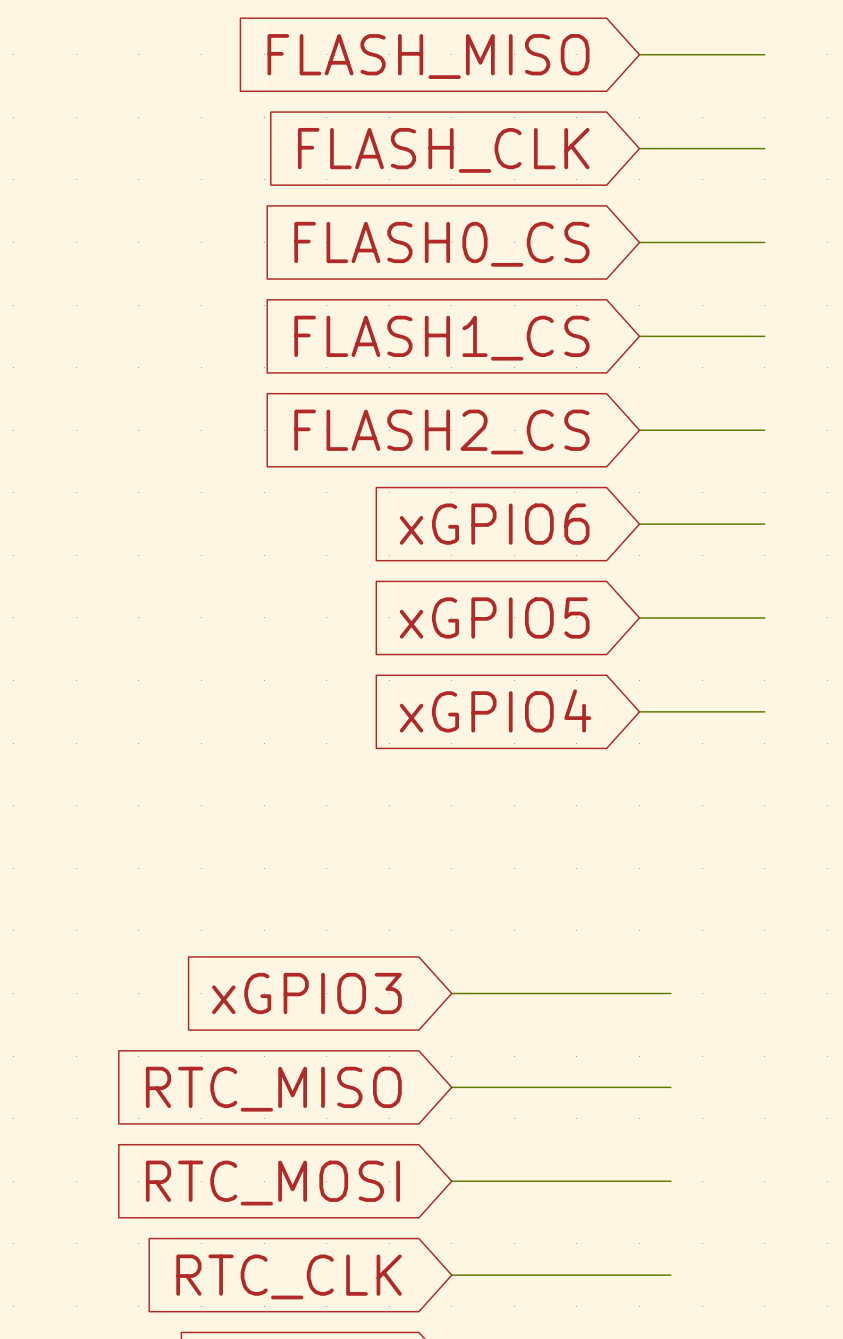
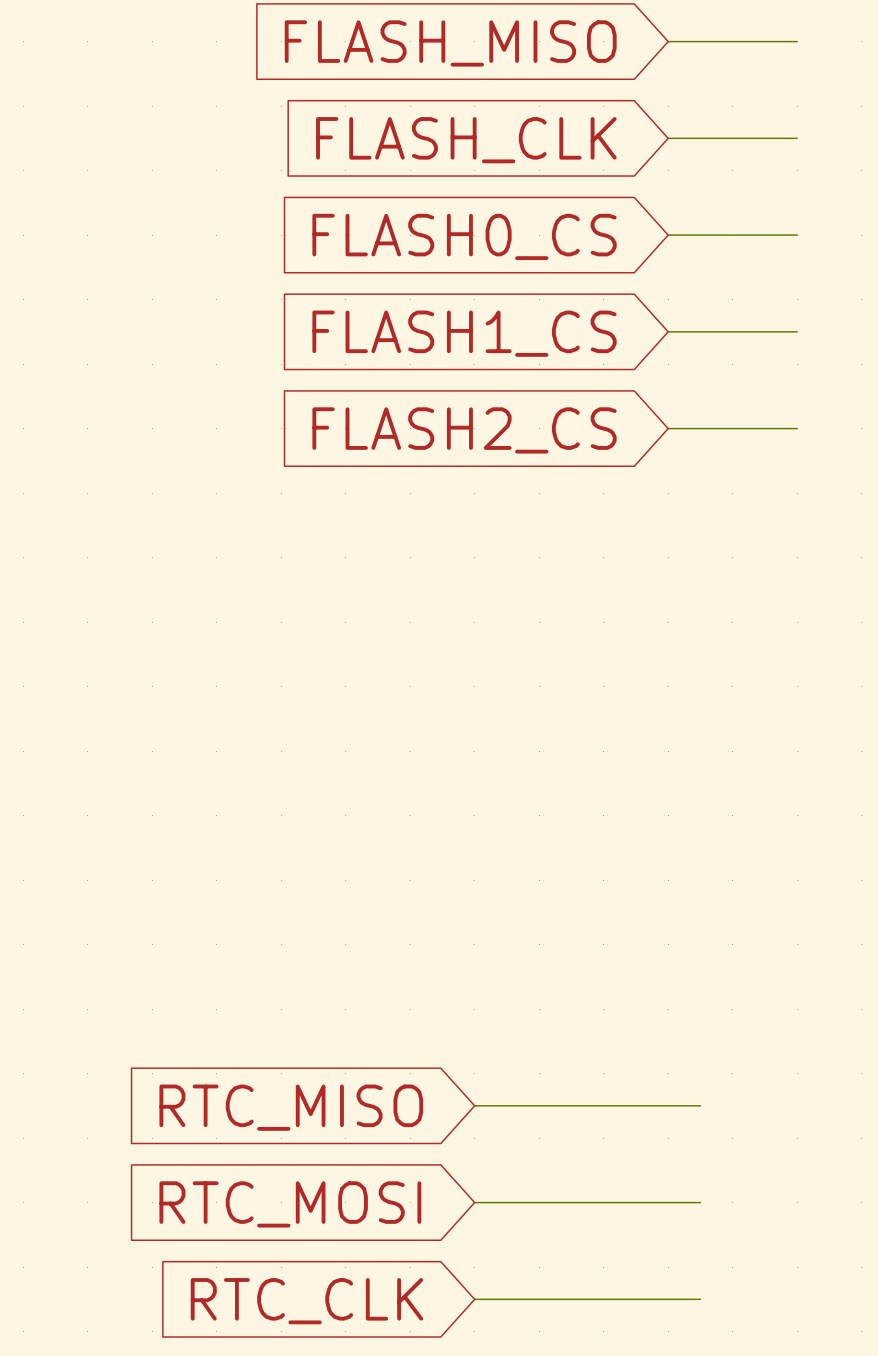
global label: xGPIO6 (494, 524) -> none
wire: (639, 524) (764, 524) -> none
global label: xGPIO5 (494, 617) -> none
wire: (639, 617) (764, 617) -> none
global label: xGPIO4 (495, 710) -> none
wire: (639, 711) (764, 711) -> none
global label: xGPIO3 (306, 993) -> none
wire: (451, 993) (670, 993) -> none

